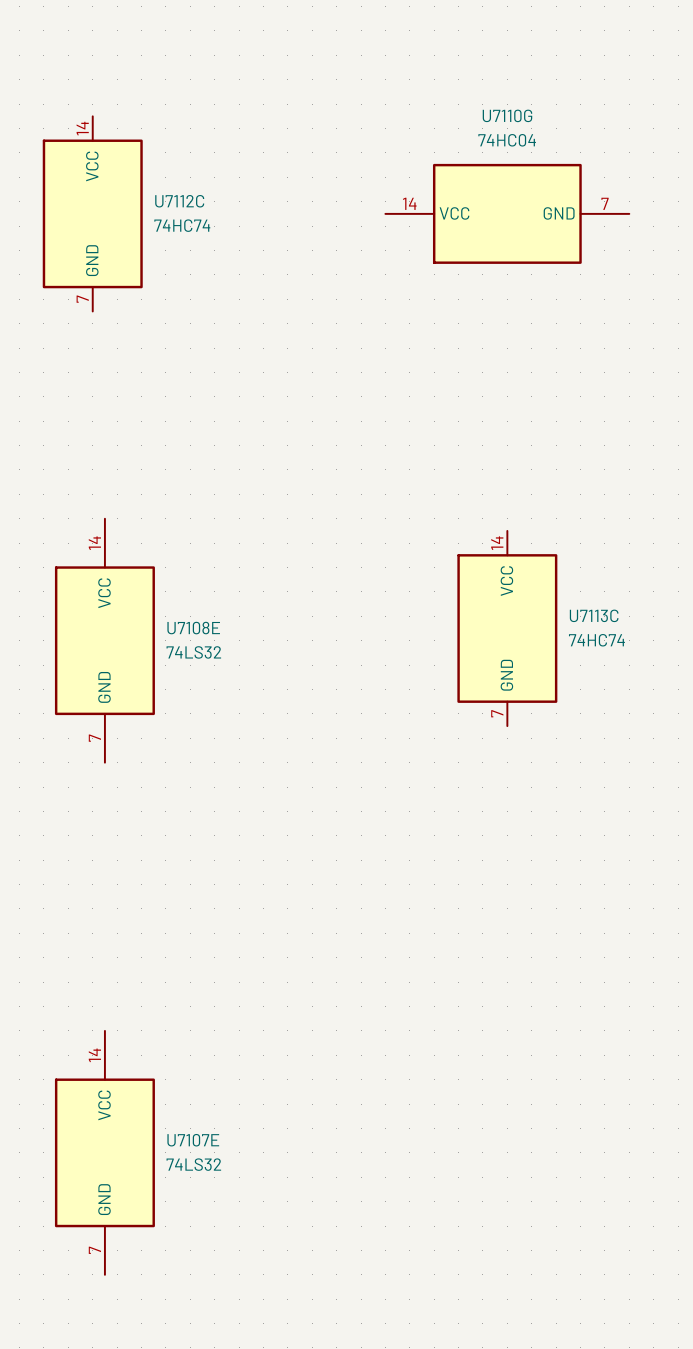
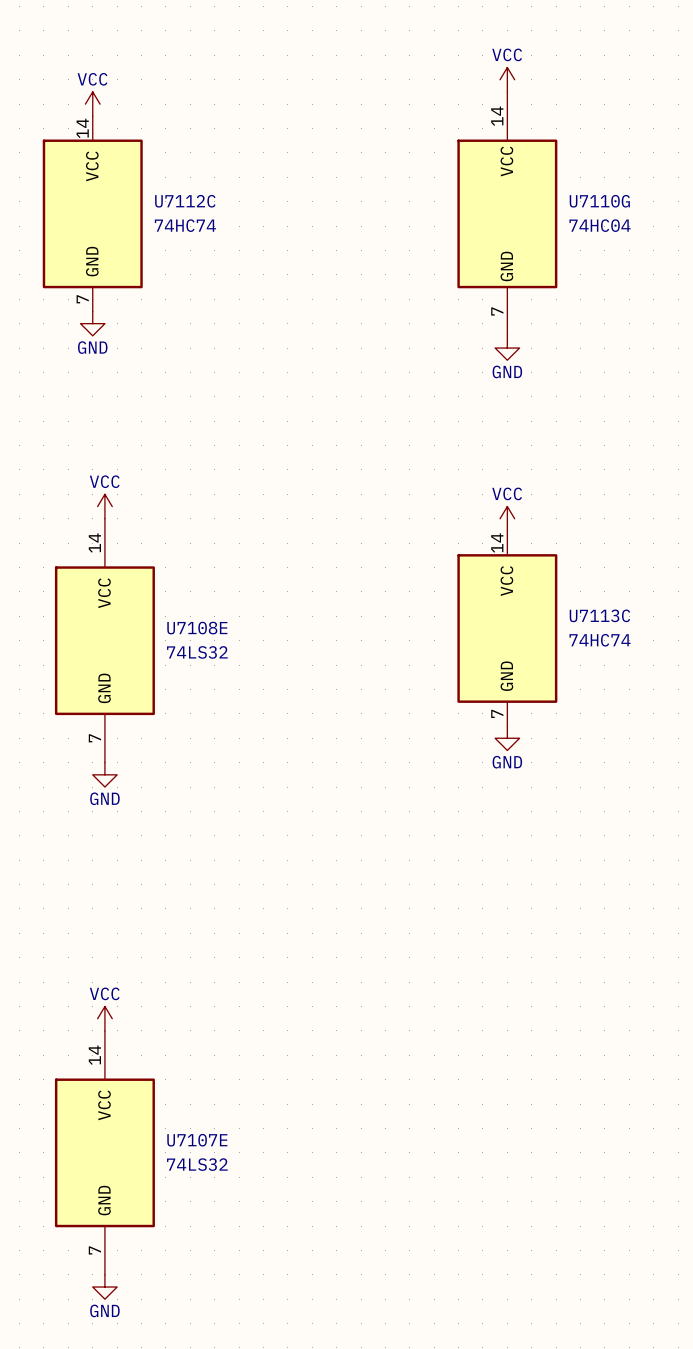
power symbol: none -> VCC (507, 79)
power symbol: none -> VCC (92, 104)
U7110G value position: 74HC04 (507, 140) -> 74HC04 (600, 225)
U7110G rotation: 0° (507, 213) -> 90° clockwise (507, 213)
power symbol: none -> GND (92, 323)
power symbol: none -> GND (507, 348)
power symbol: none -> VCC (104, 506)
power symbol: none -> VCC (507, 518)
power symbol: none -> GND (507, 738)
power symbol: none -> GND (104, 774)
power symbol: none -> VCC (104, 1018)
power symbol: none -> GND (104, 1287)

